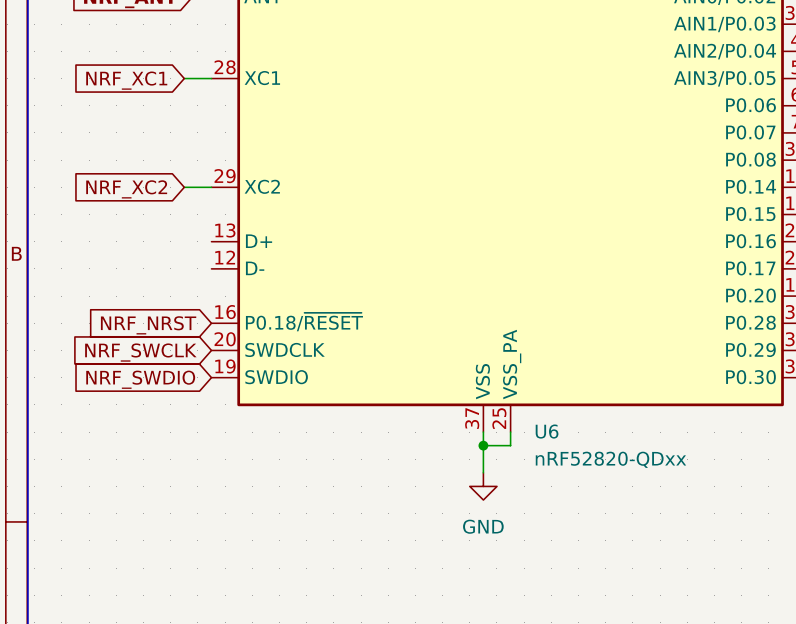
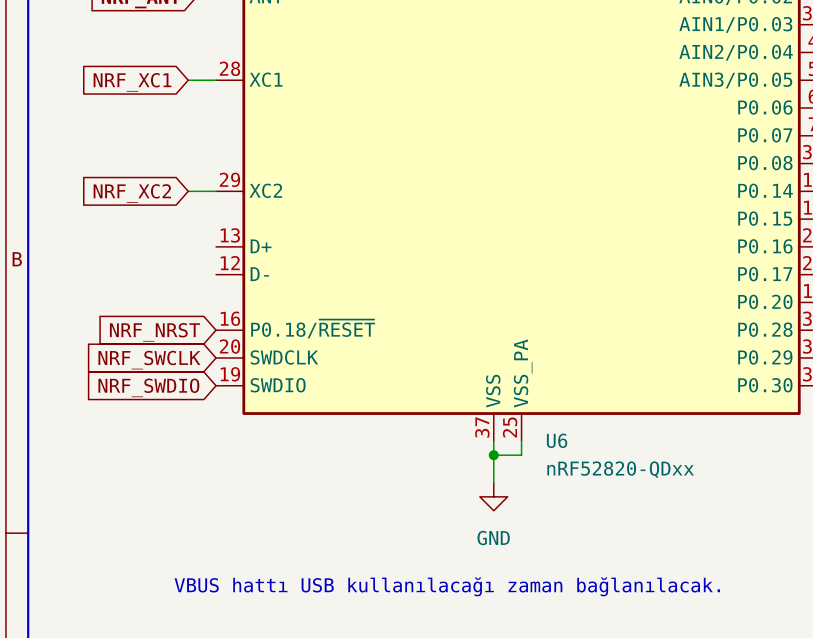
text: none -> VBUS hattı USB kullanılacağı zaman bağlanılacak. (447, 586)

